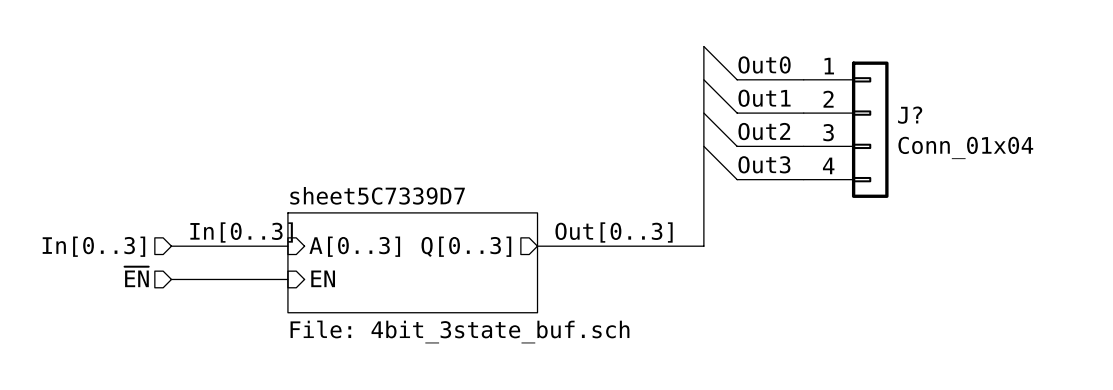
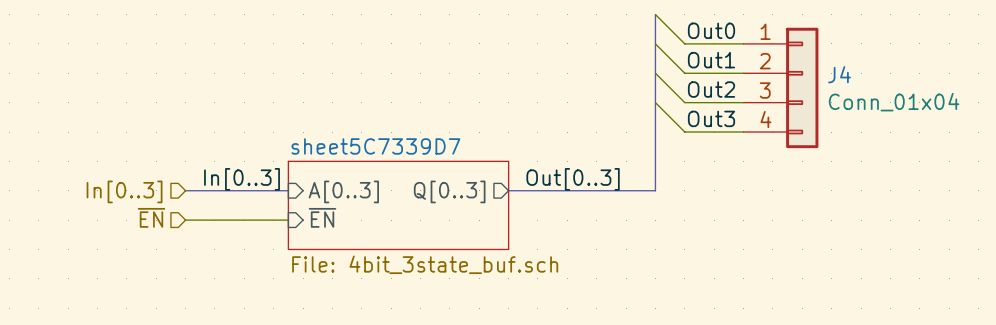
J? name: J? (910, 115) -> J4 (839, 74)
sheet pin: EN (323, 278) -> ~{EN} (322, 217)

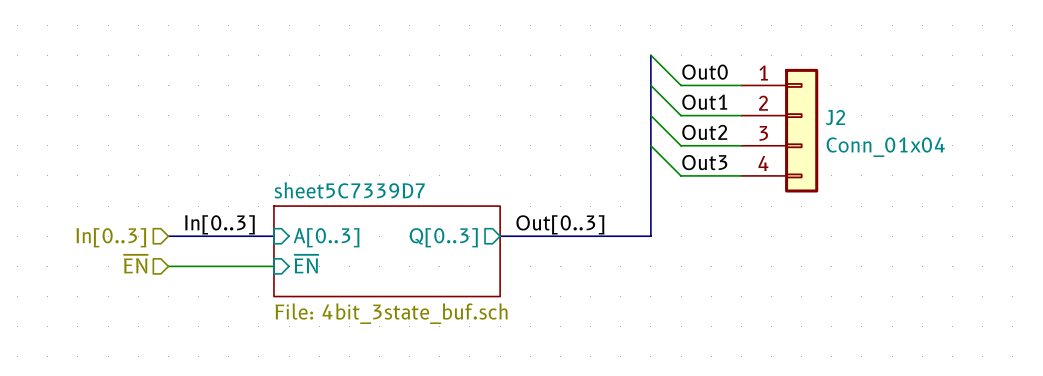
J4 name: J4 (839, 74) -> J2 (835, 117)

